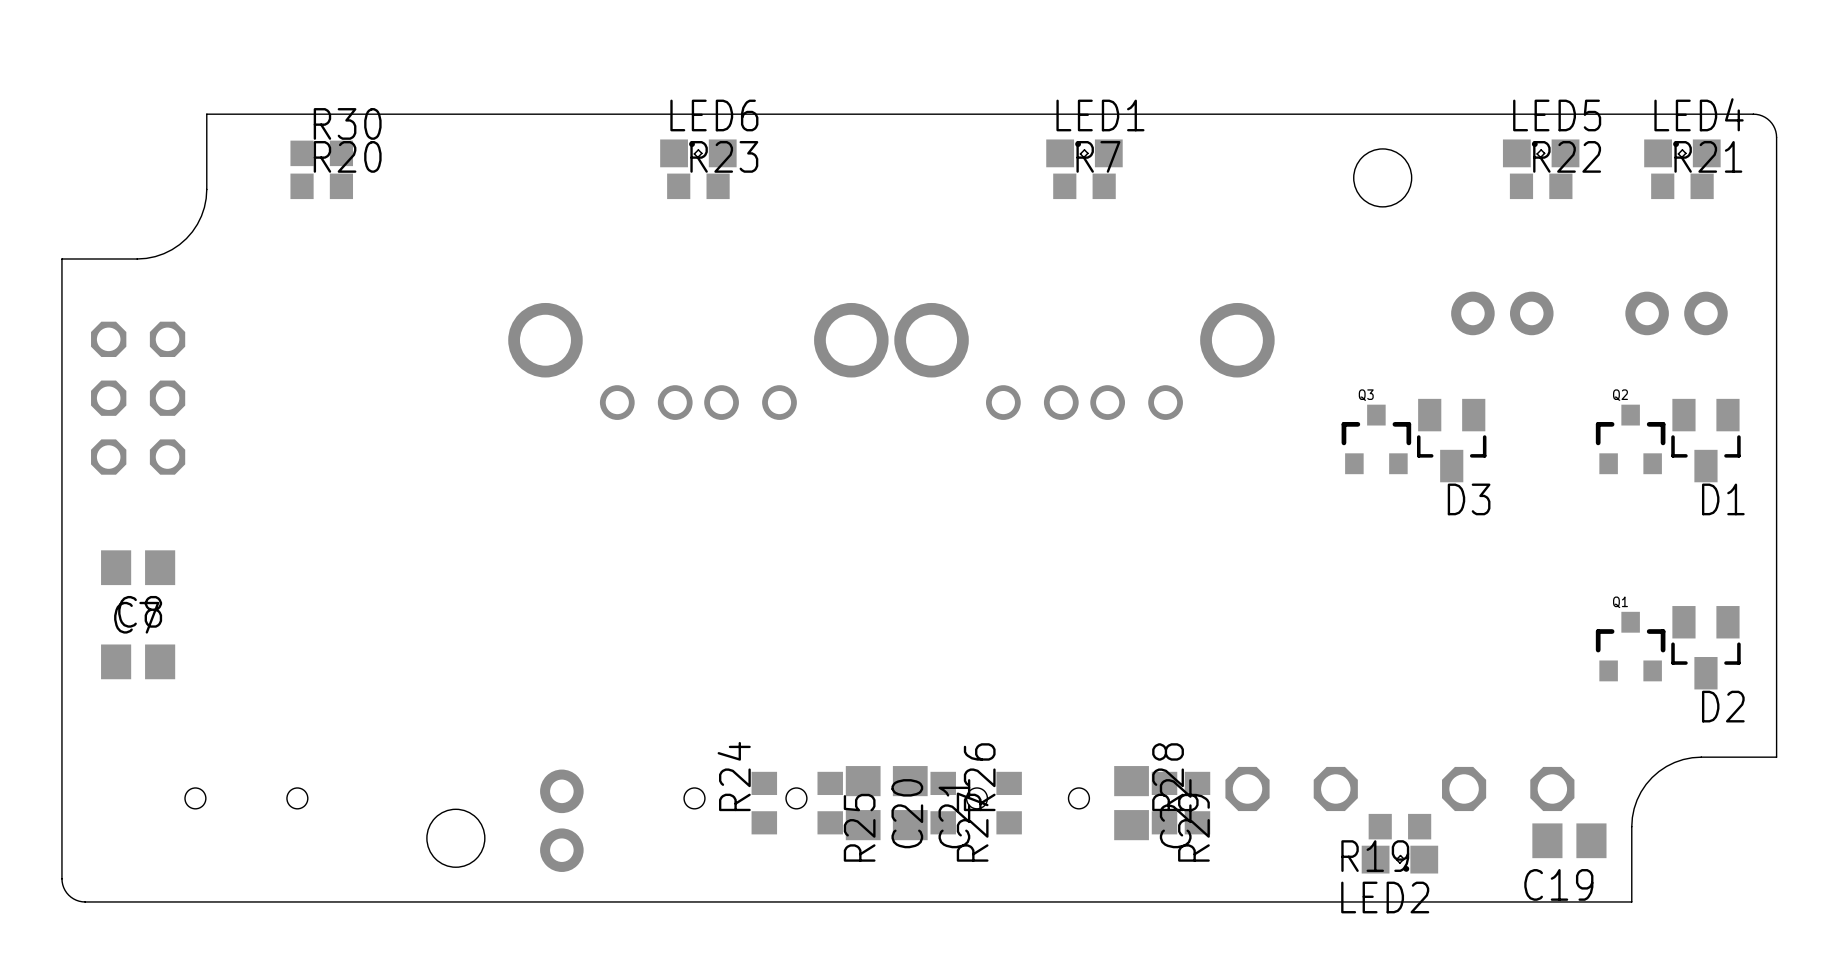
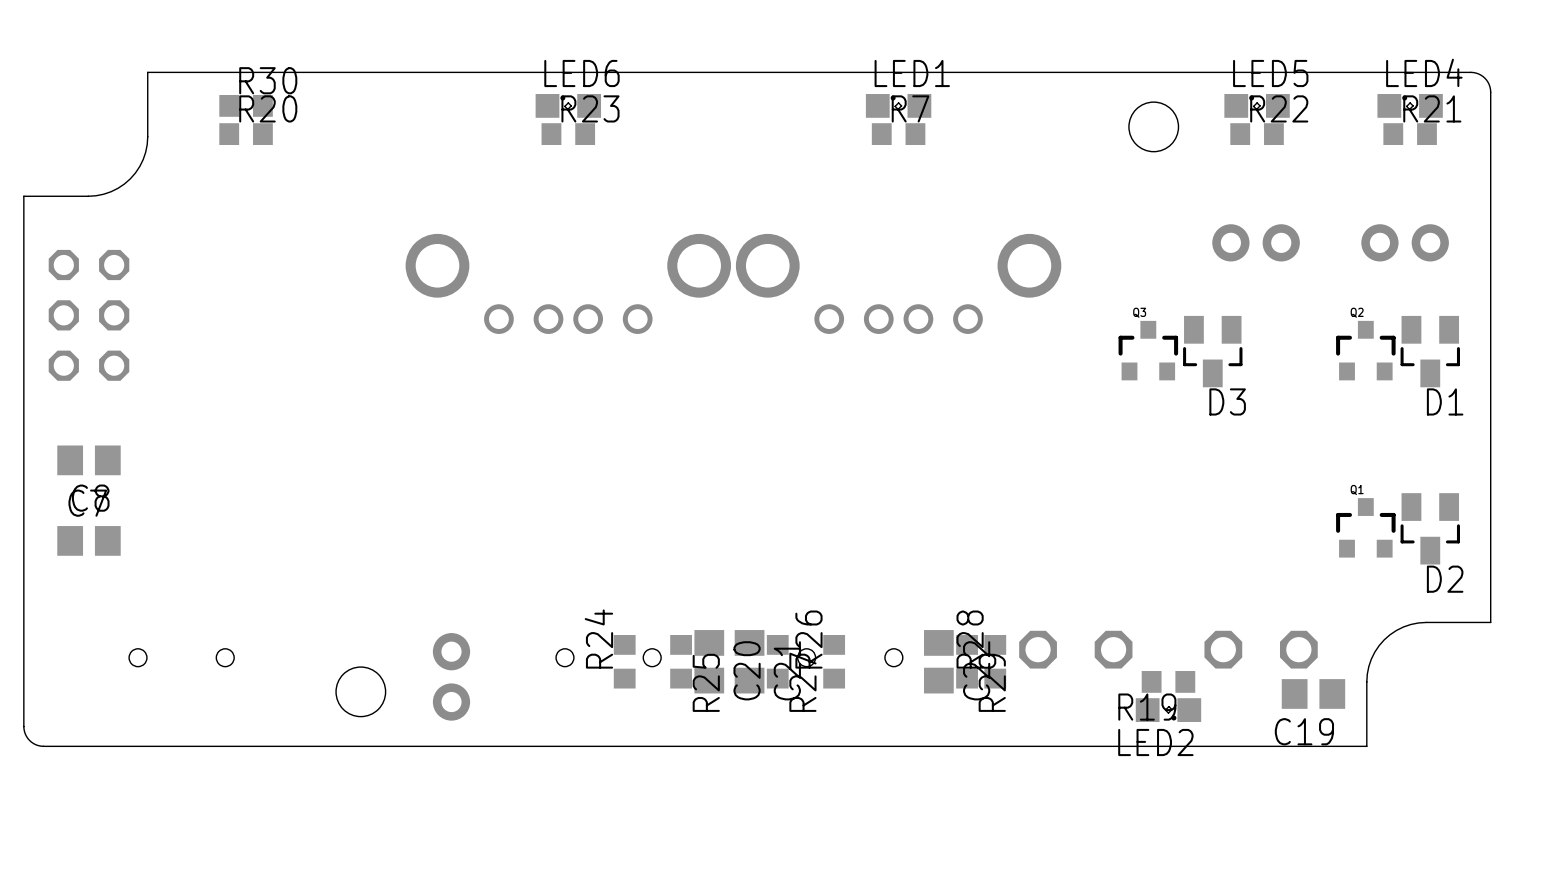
LED5 position: (1541, 153) -> (1257, 105)
R22 position: (1541, 186) -> (1257, 134)

